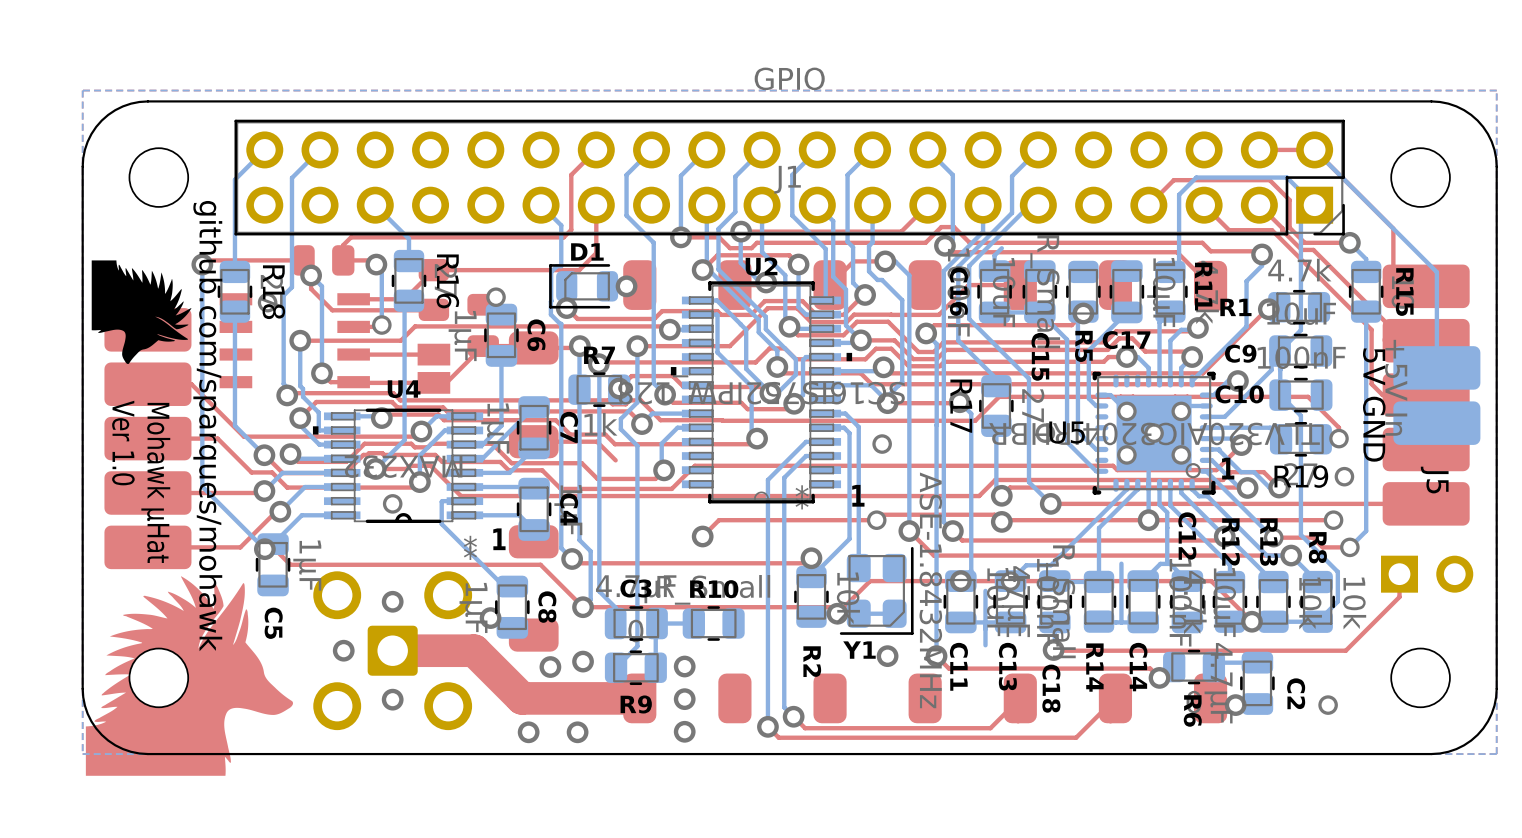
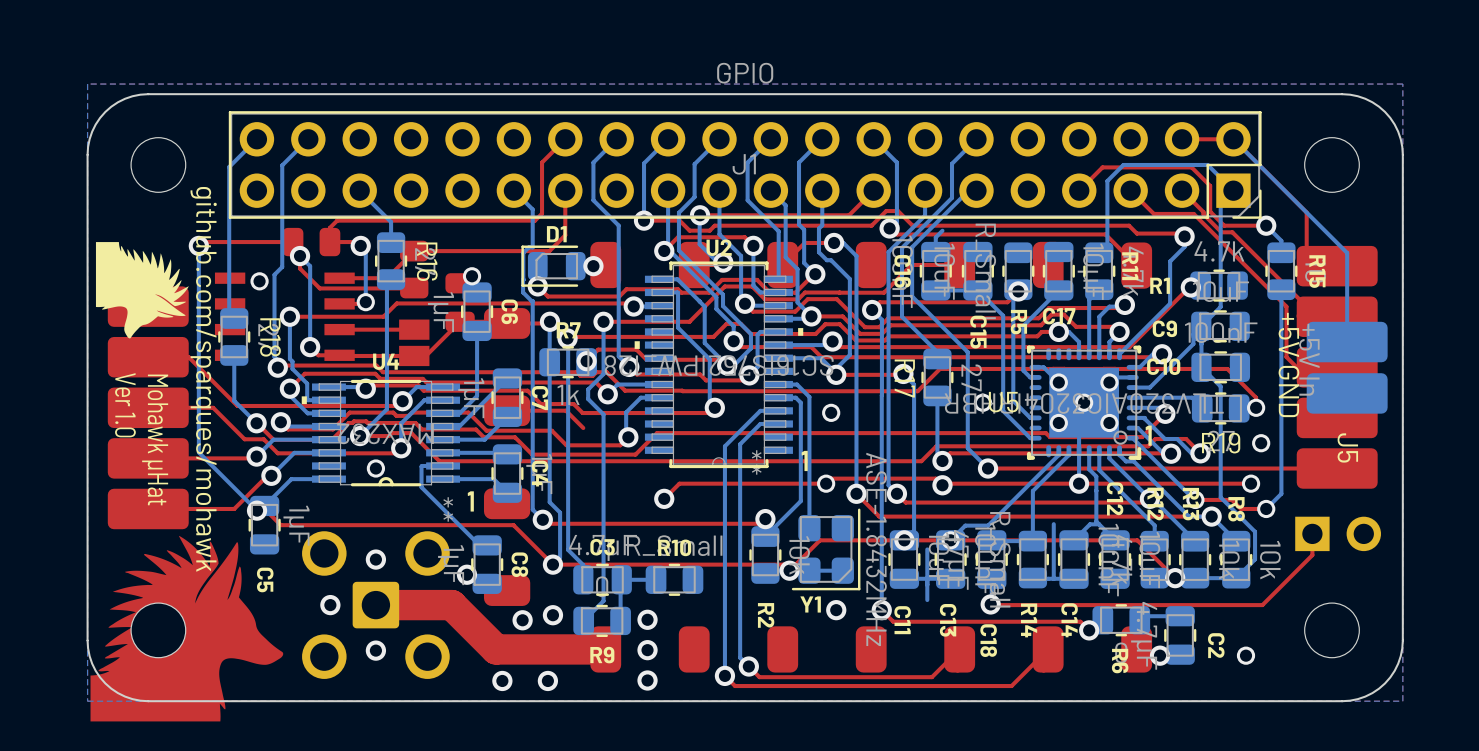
bottom track: none -> (229, 252) (229, 289)
R18 position: (234, 291) -> (234, 336)
bottom track: (234, 337) (234, 425) (240, 431) -> (234, 355) (234, 400)
text: 5V GND (1374, 405) -> +5V GND (1288, 364)

